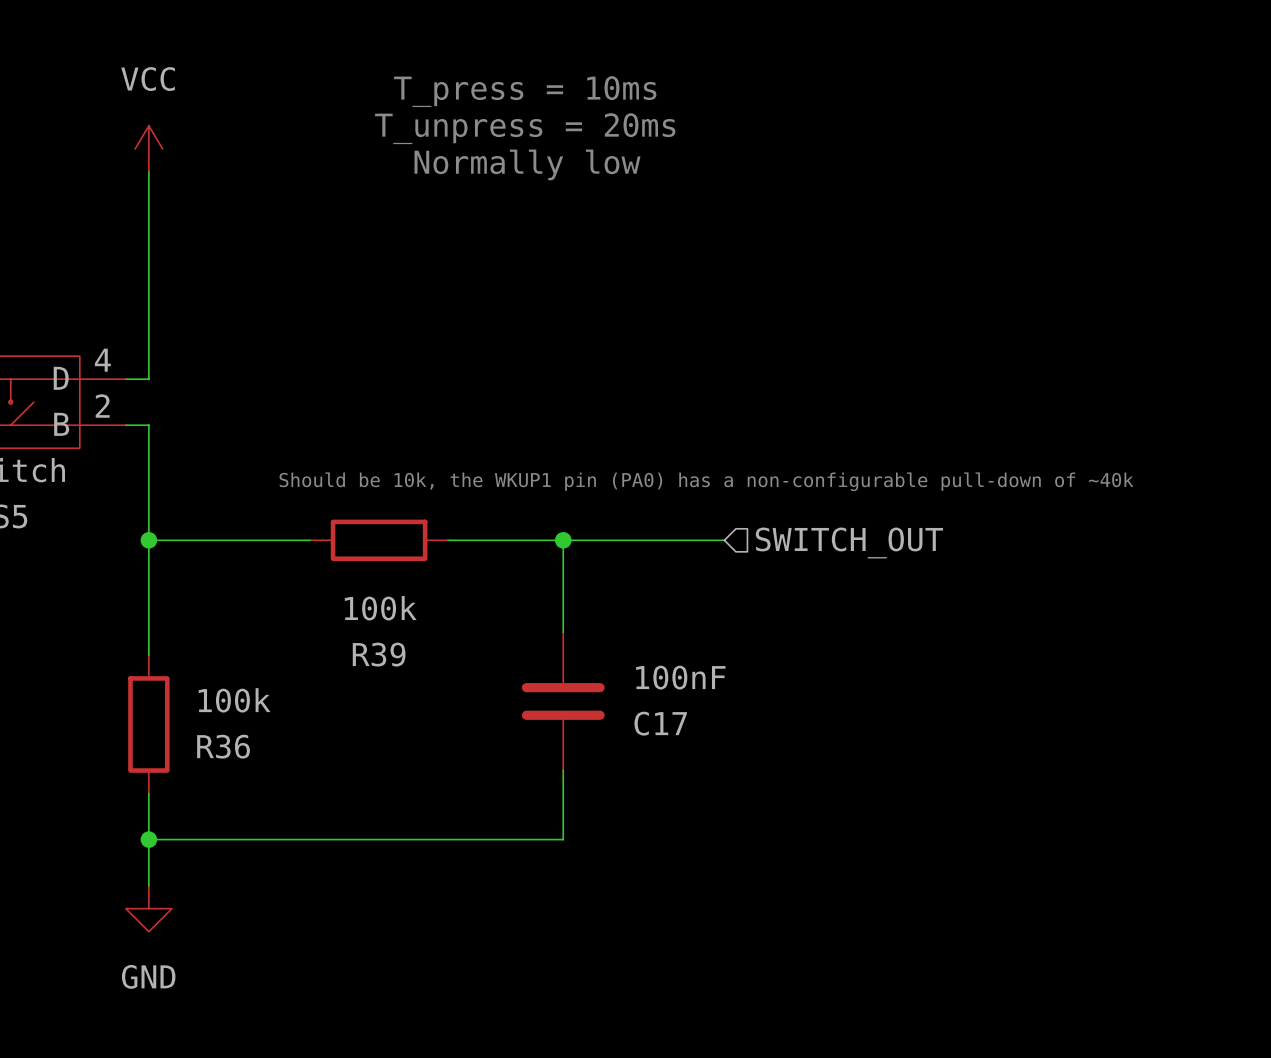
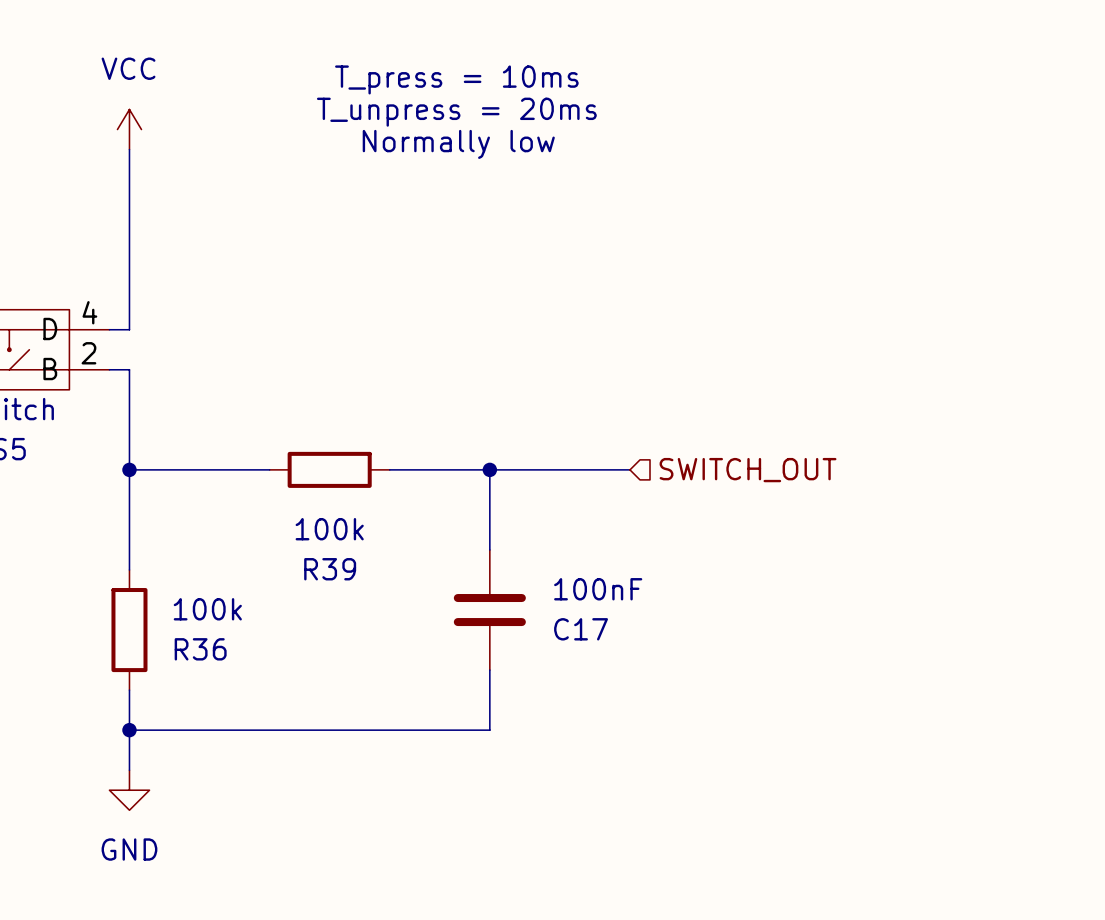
text: Should be 10k, the WKUP1 pin (PA0) has a non-configurable pull-down of ~40k (706, 481) -> none

